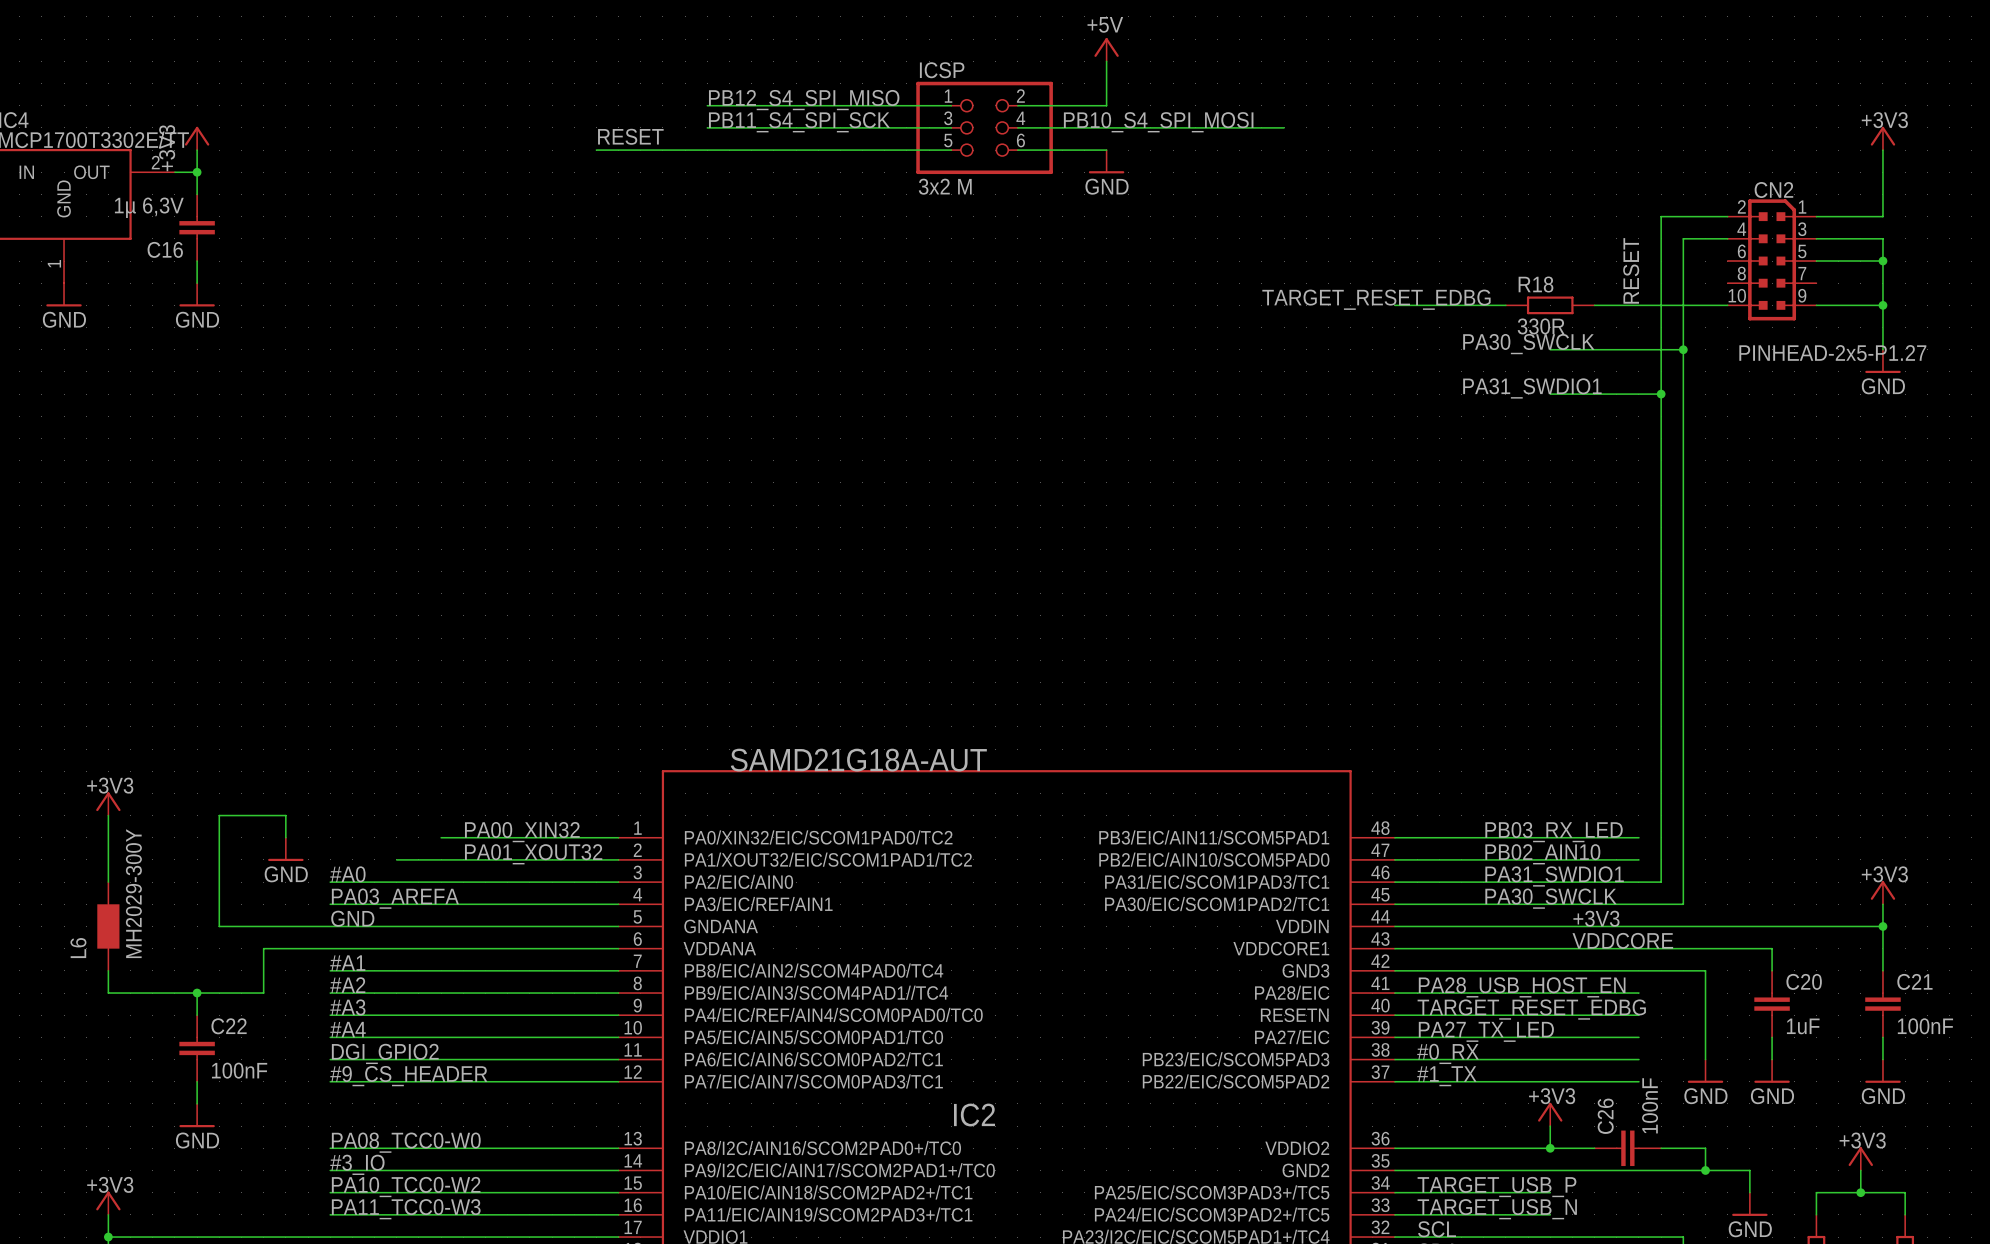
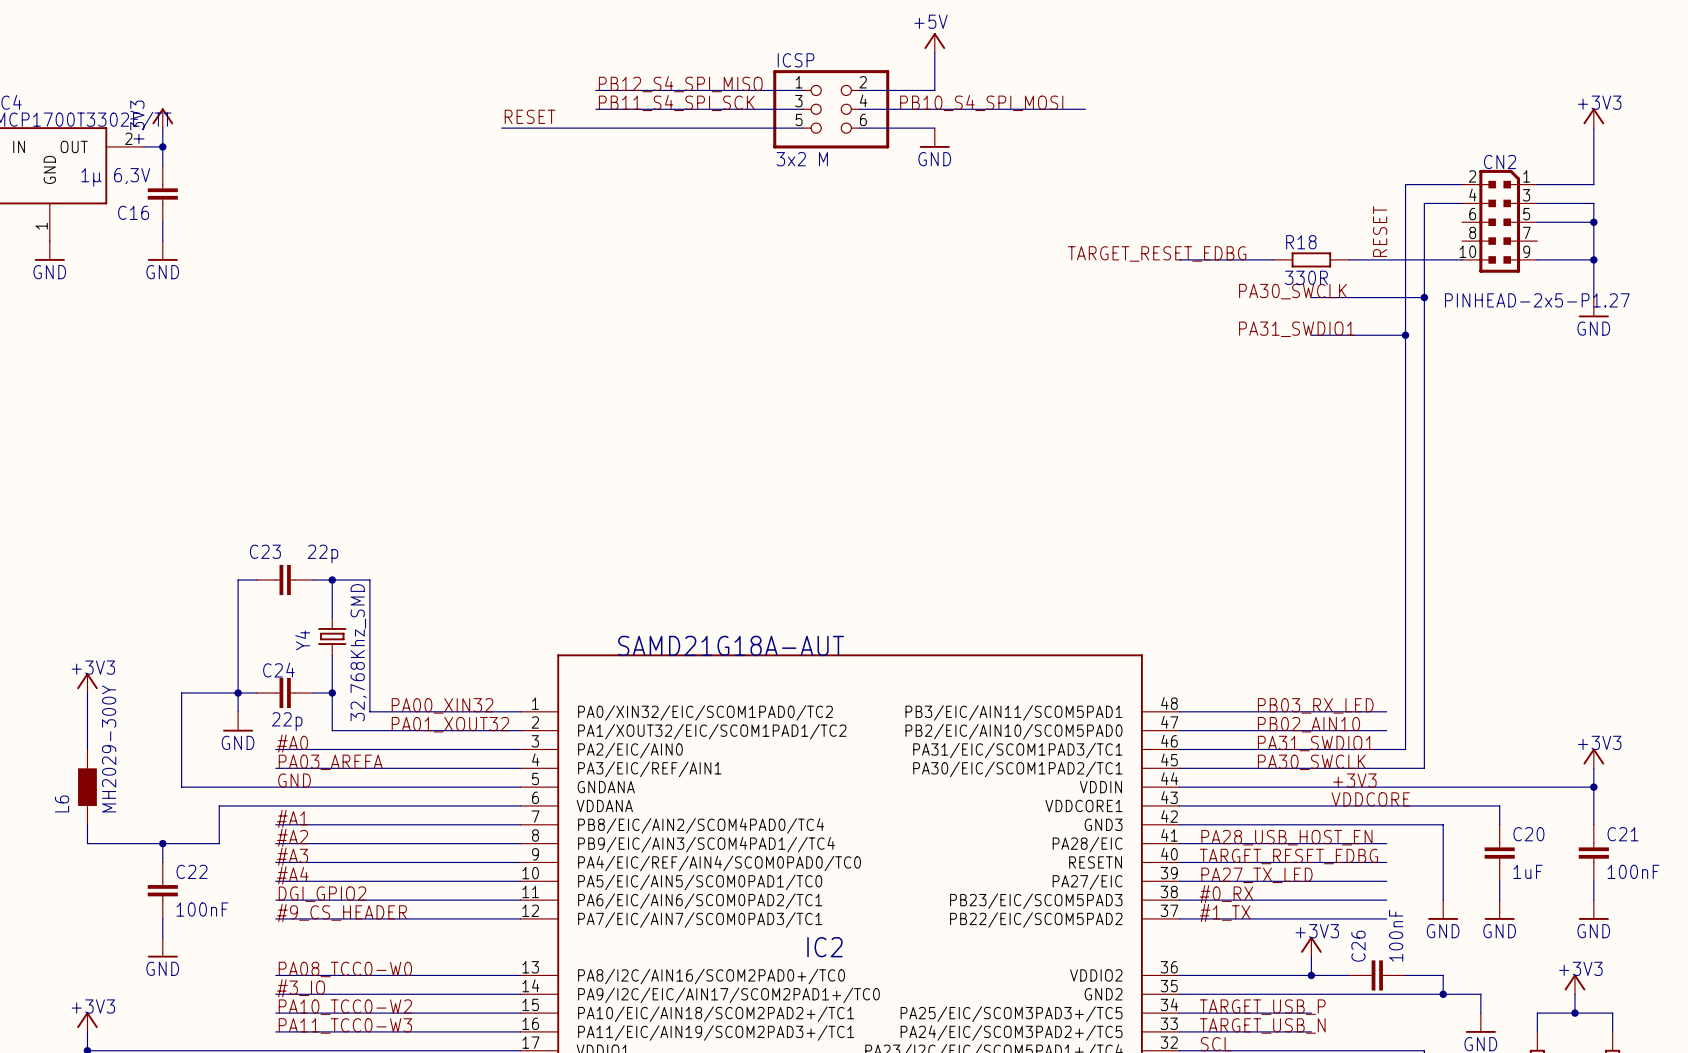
wire: none -> (256, 580) (238, 580) (238, 692) (256, 692)
C23: none -> 22p (285, 580)
wire: none -> (313, 580) (369, 580) (369, 711)
wire: none -> (332, 580) (332, 617)
junction: none -> (332, 580)
Y4: none -> 32,768Khz_SMD (332, 636)
wire: none -> (332, 655) (332, 730)
junction: none -> (238, 692)
C24: none -> 22p (285, 692)
wire: none -> (313, 692) (332, 692)
junction: none -> (332, 692)

